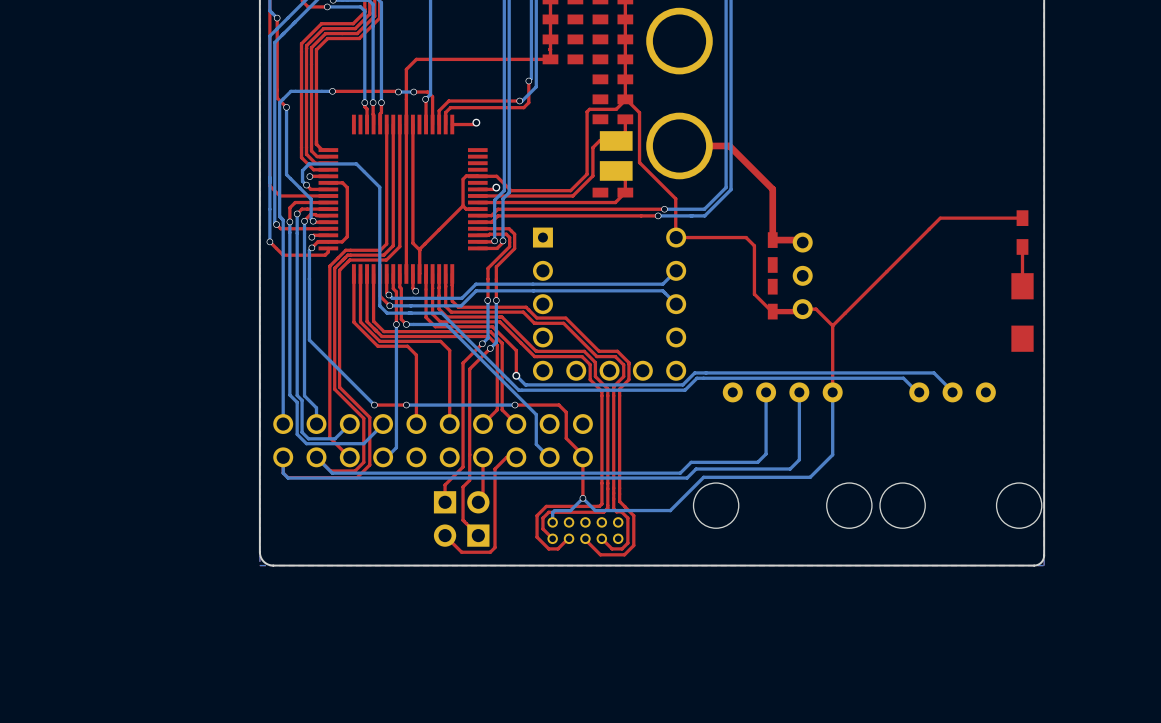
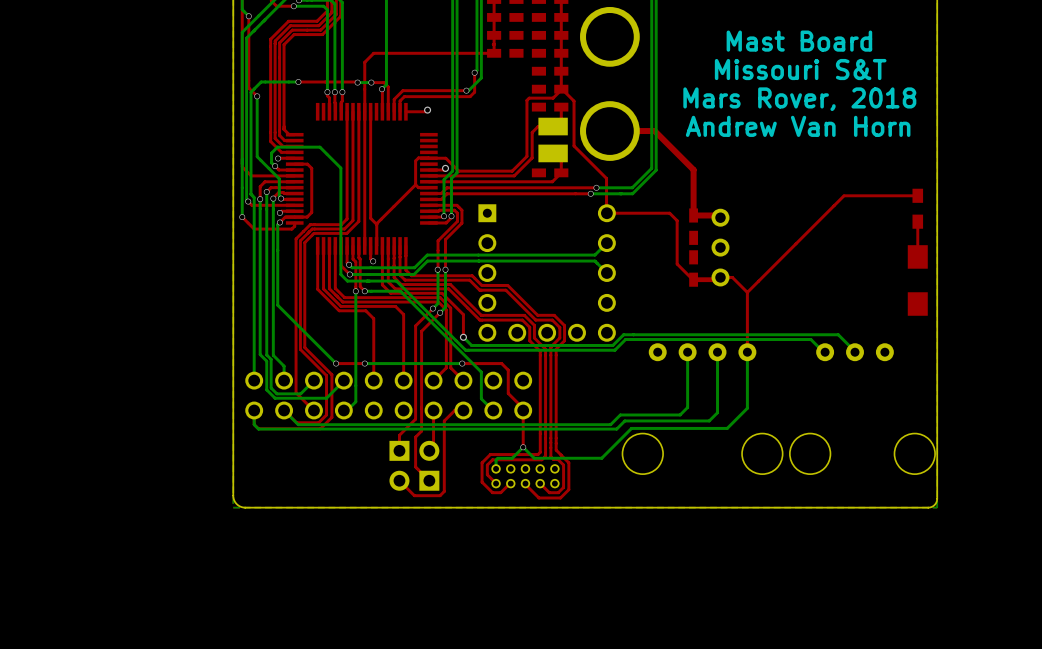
text: none -> Mast Board (799, 41)
text: none -> Missouri S&T (800, 69)
text: none -> Mars Rover, 2018 (799, 99)
text: none -> Andrew Van Horn (798, 126)

